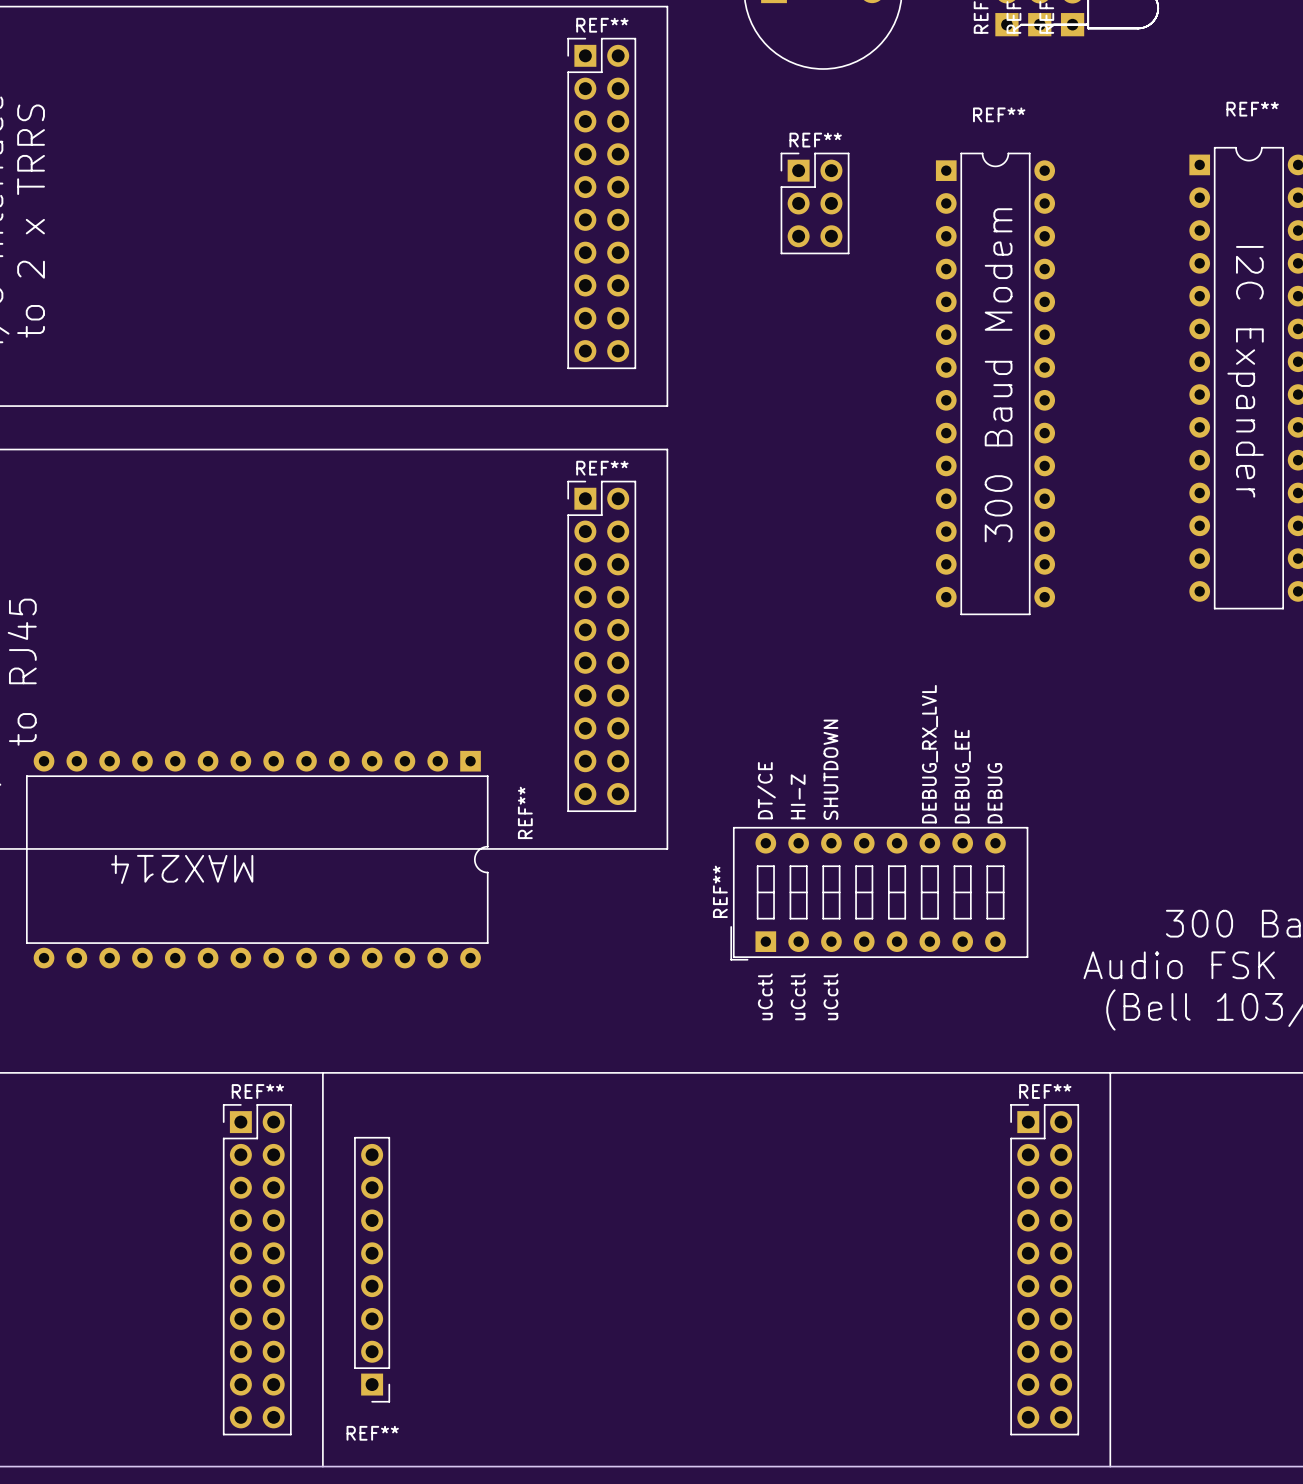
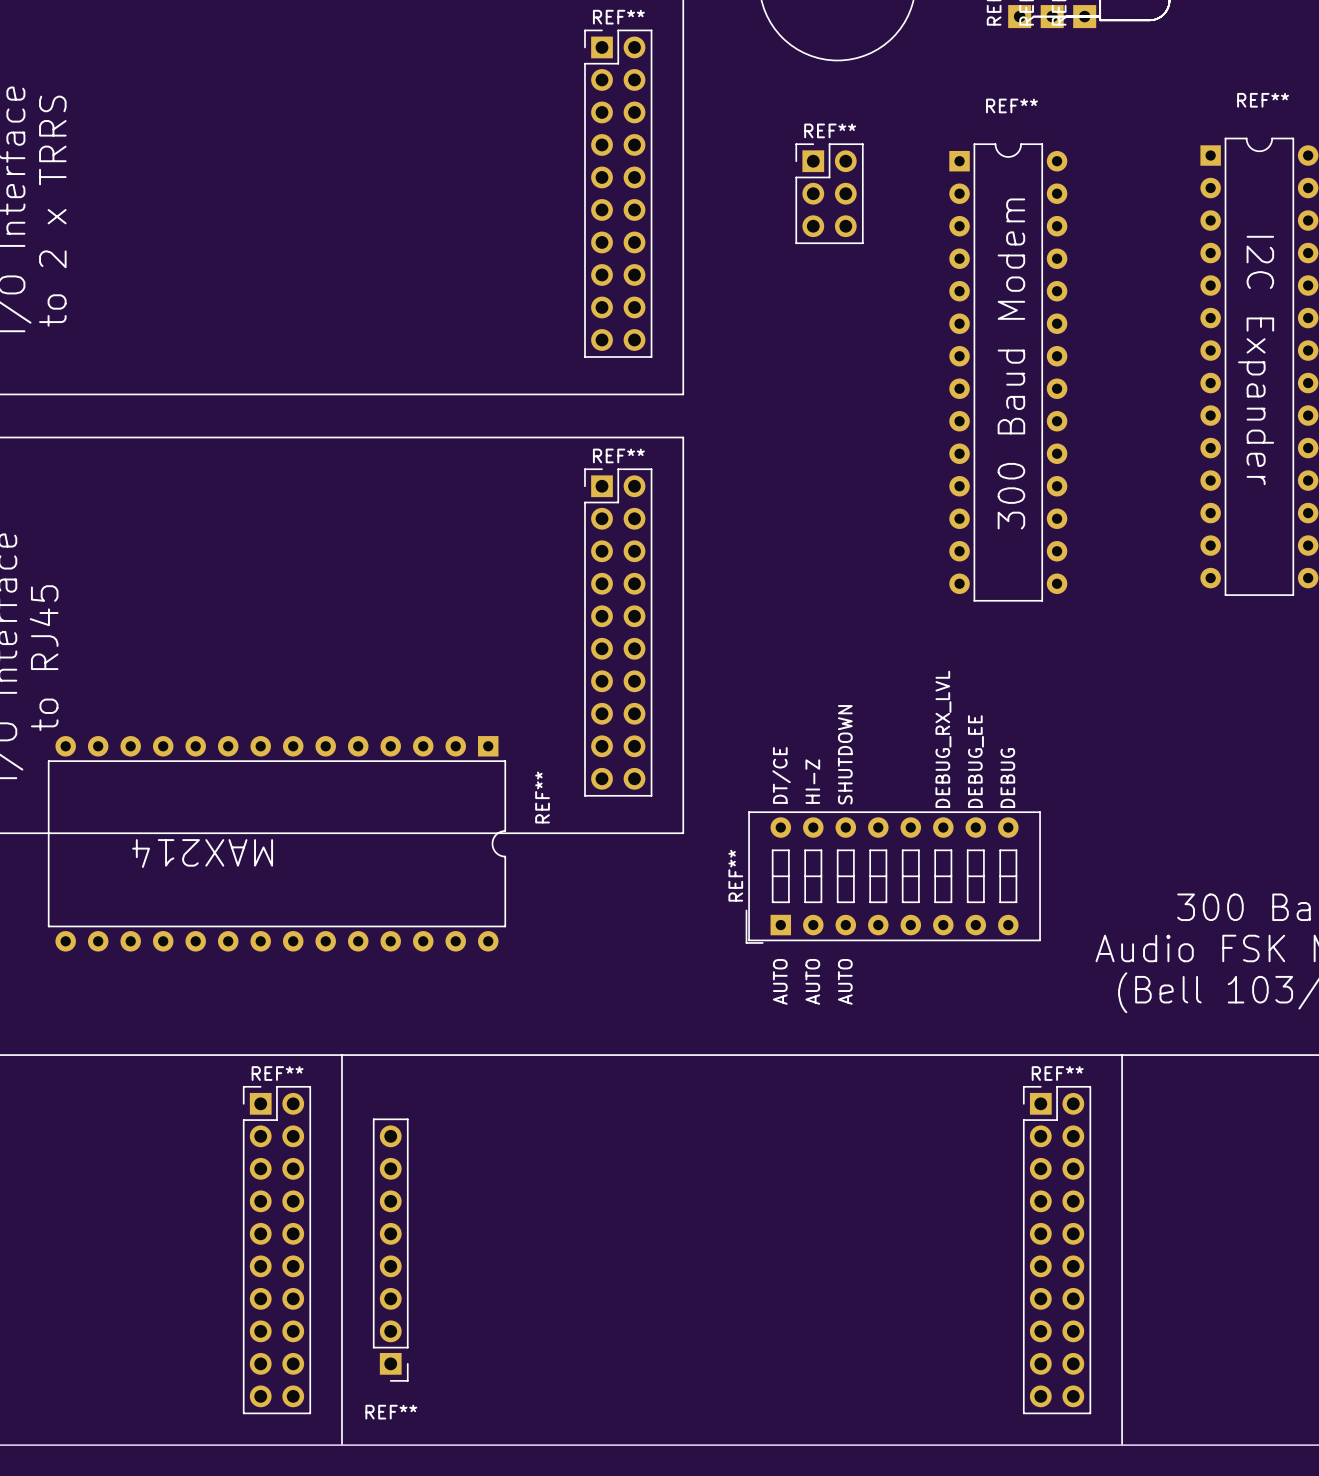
text: uCctl (765, 996) -> AUTO (780, 981)
text: uCctl (798, 996) -> AUTO (812, 981)
text: uCctl (830, 996) -> AUTO (845, 981)

